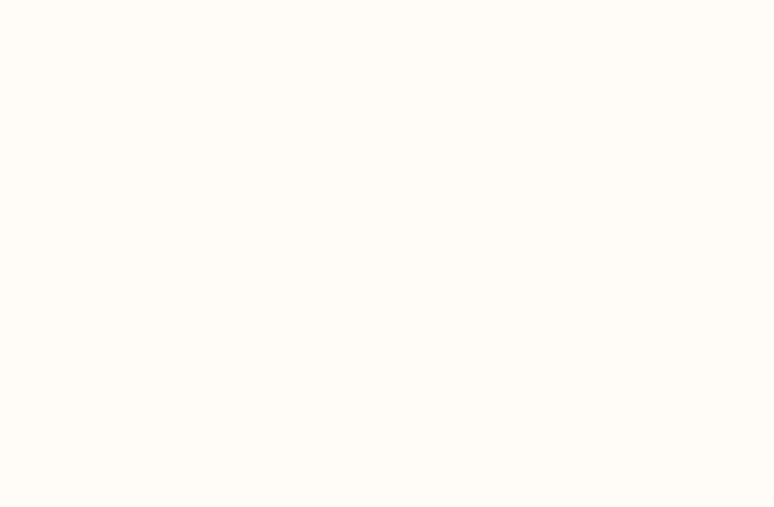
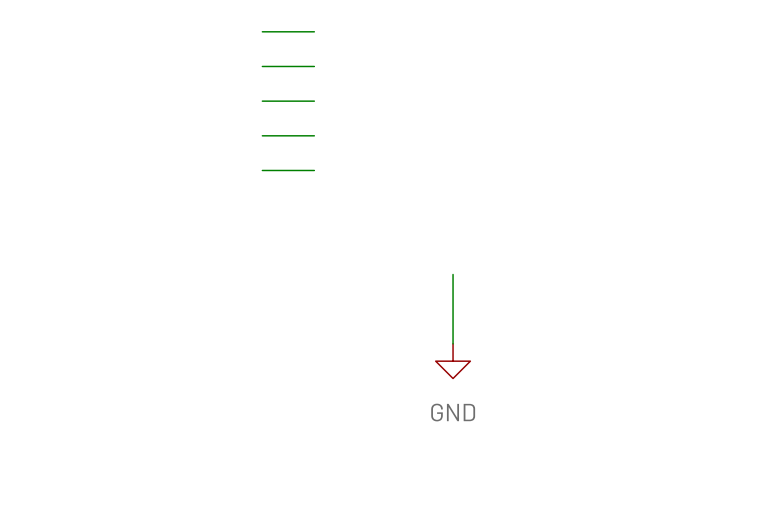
wire: none -> (262, 31) (314, 31)
wire: none -> (262, 66) (314, 66)
wire: none -> (262, 101) (314, 101)
wire: none -> (262, 135) (314, 135)
wire: none -> (262, 170) (314, 170)
wire: none -> (453, 274) (453, 343)
power symbol: none -> GND (453, 361)

